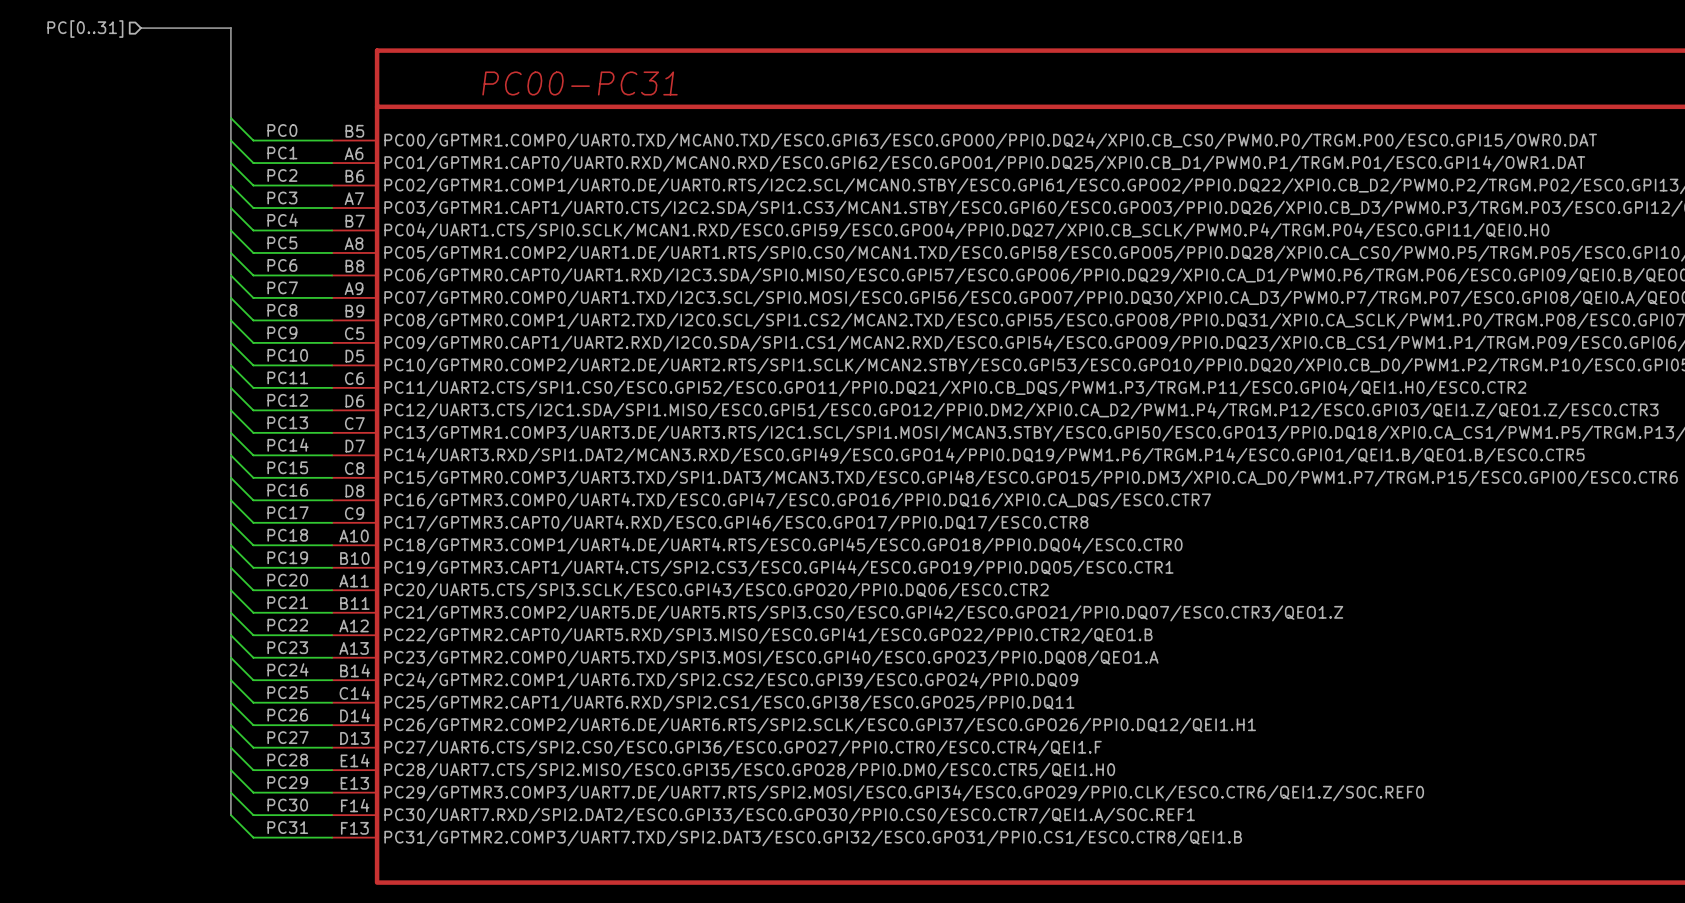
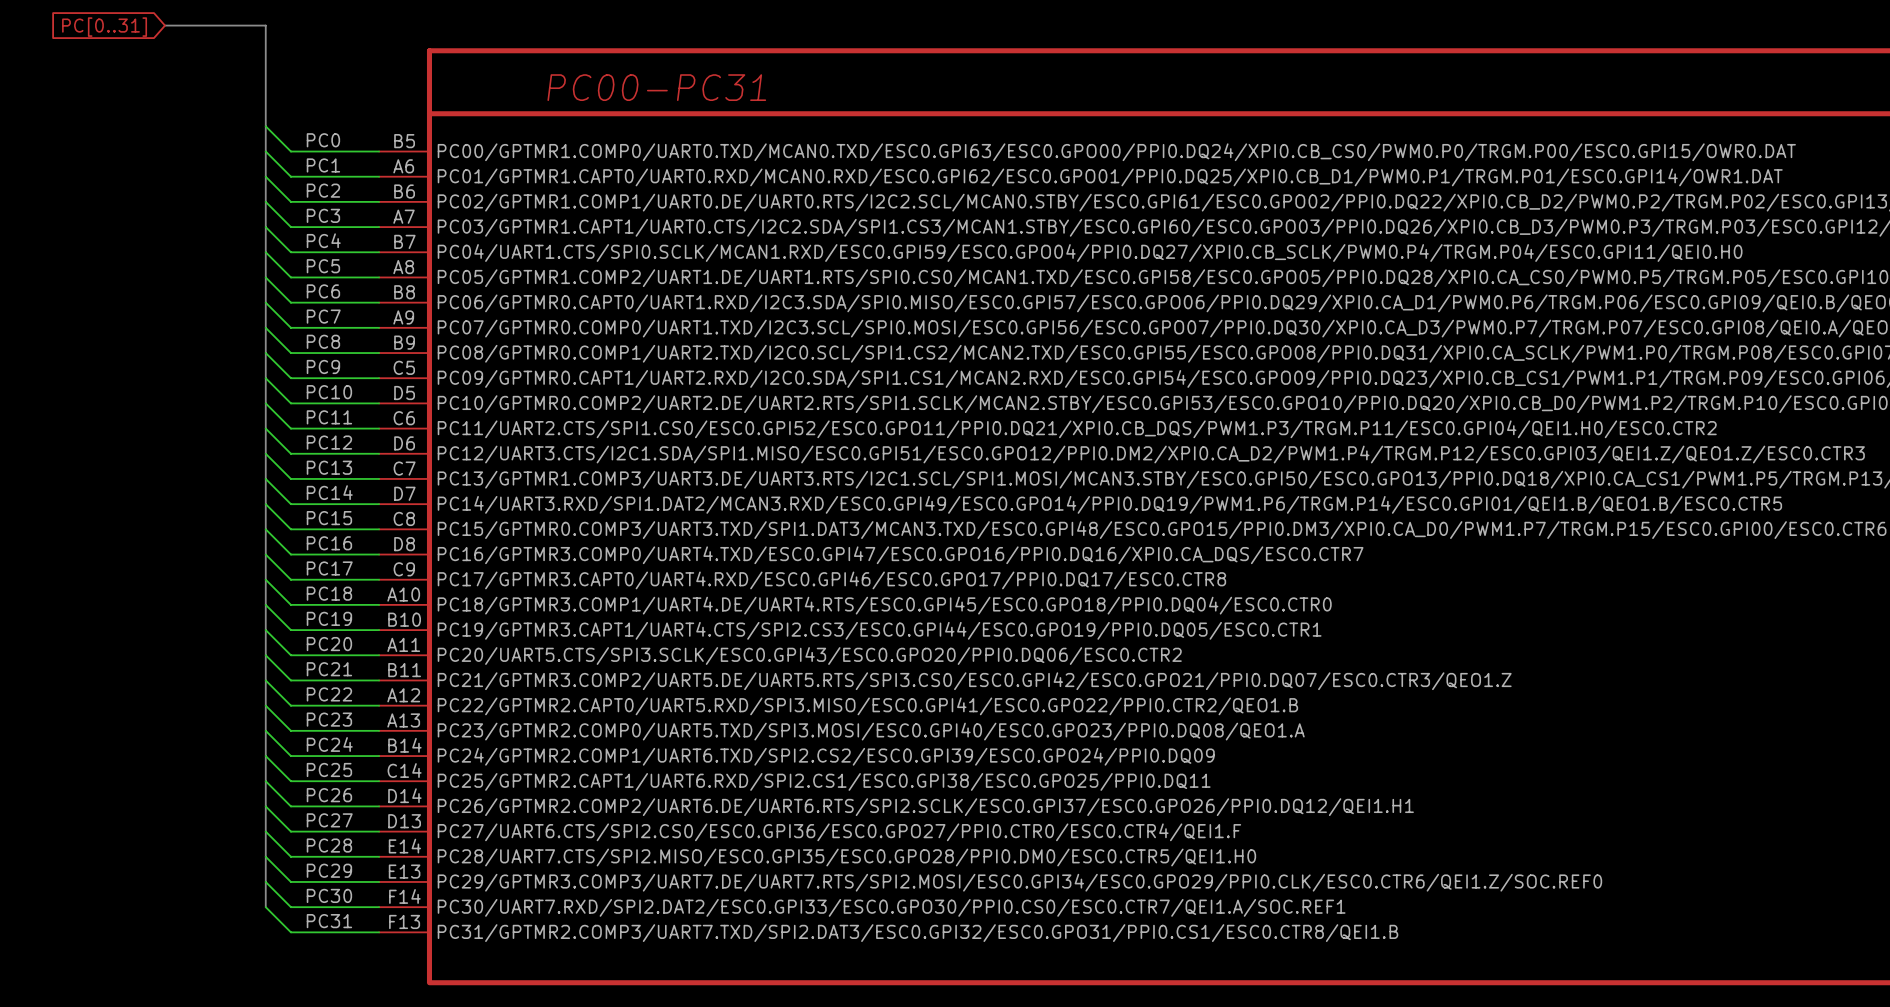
hierarchical label: PC[0..31] (85, 29) -> none
global label: none -> PC[0..31] (104, 27)

